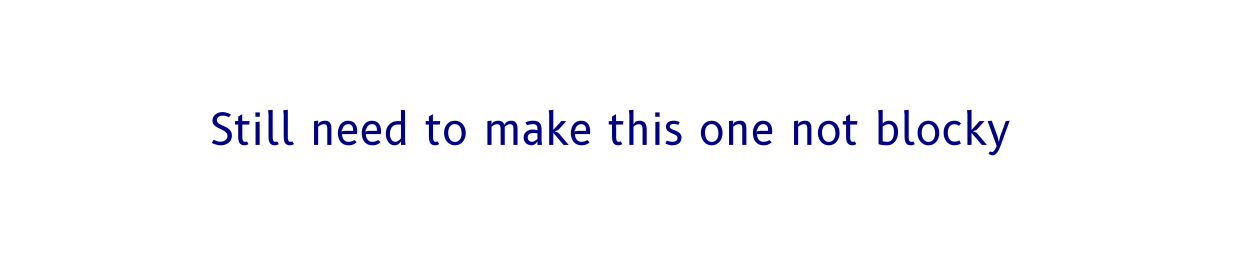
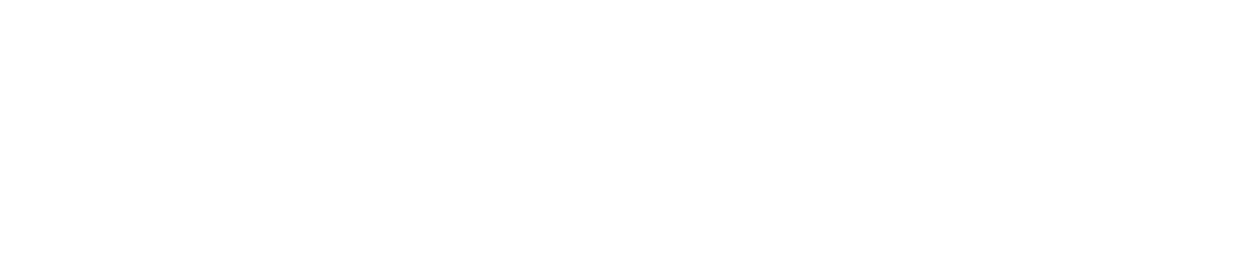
text: Still need to make this one not blocky (610, 132) -> none

